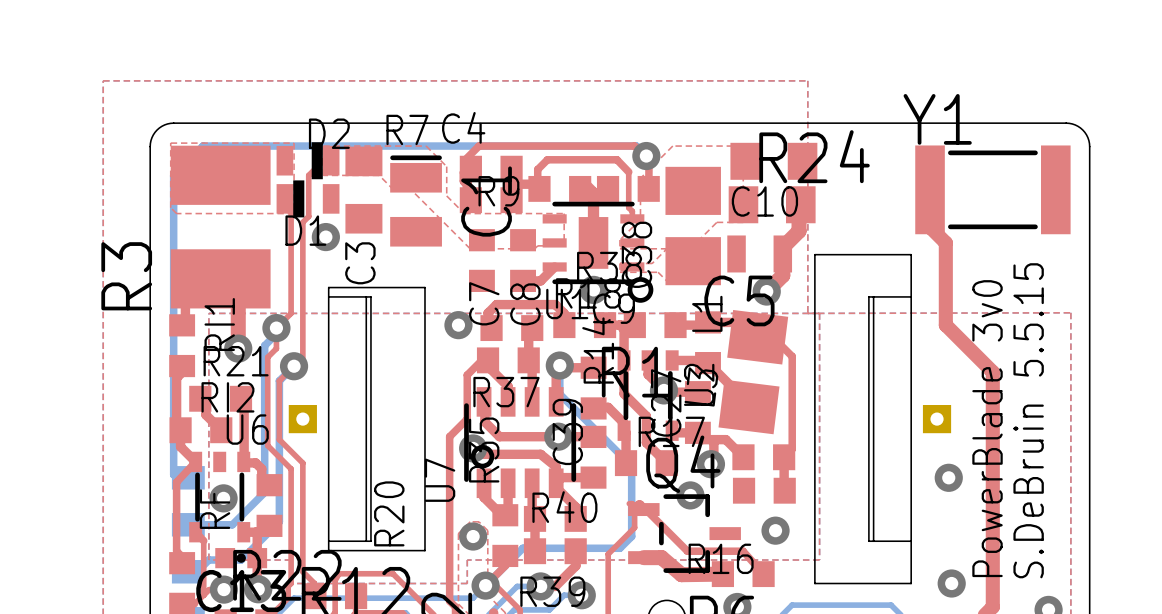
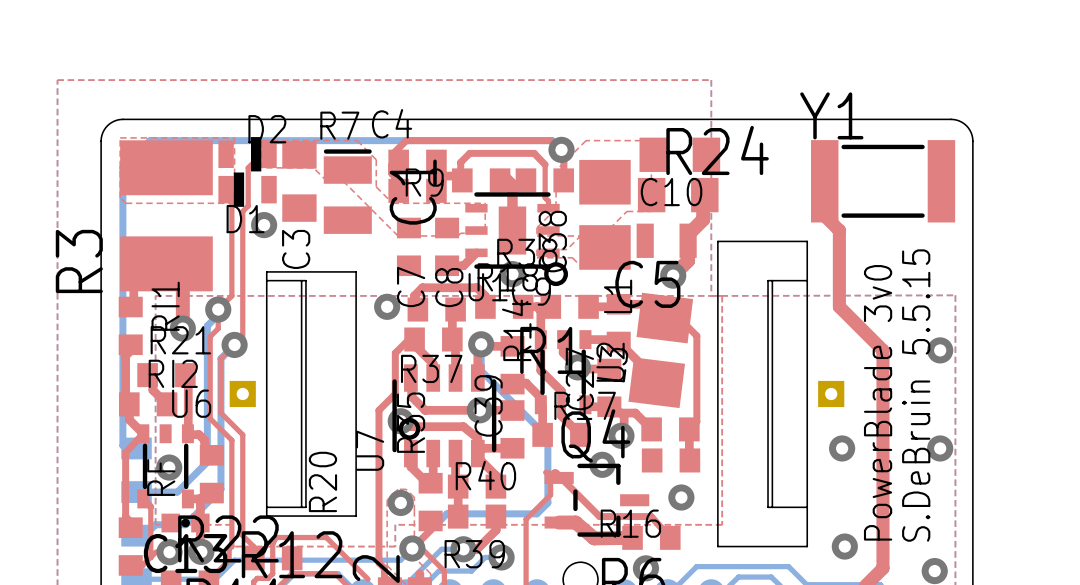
via: none -> (940, 350)
via: none -> (940, 448)

